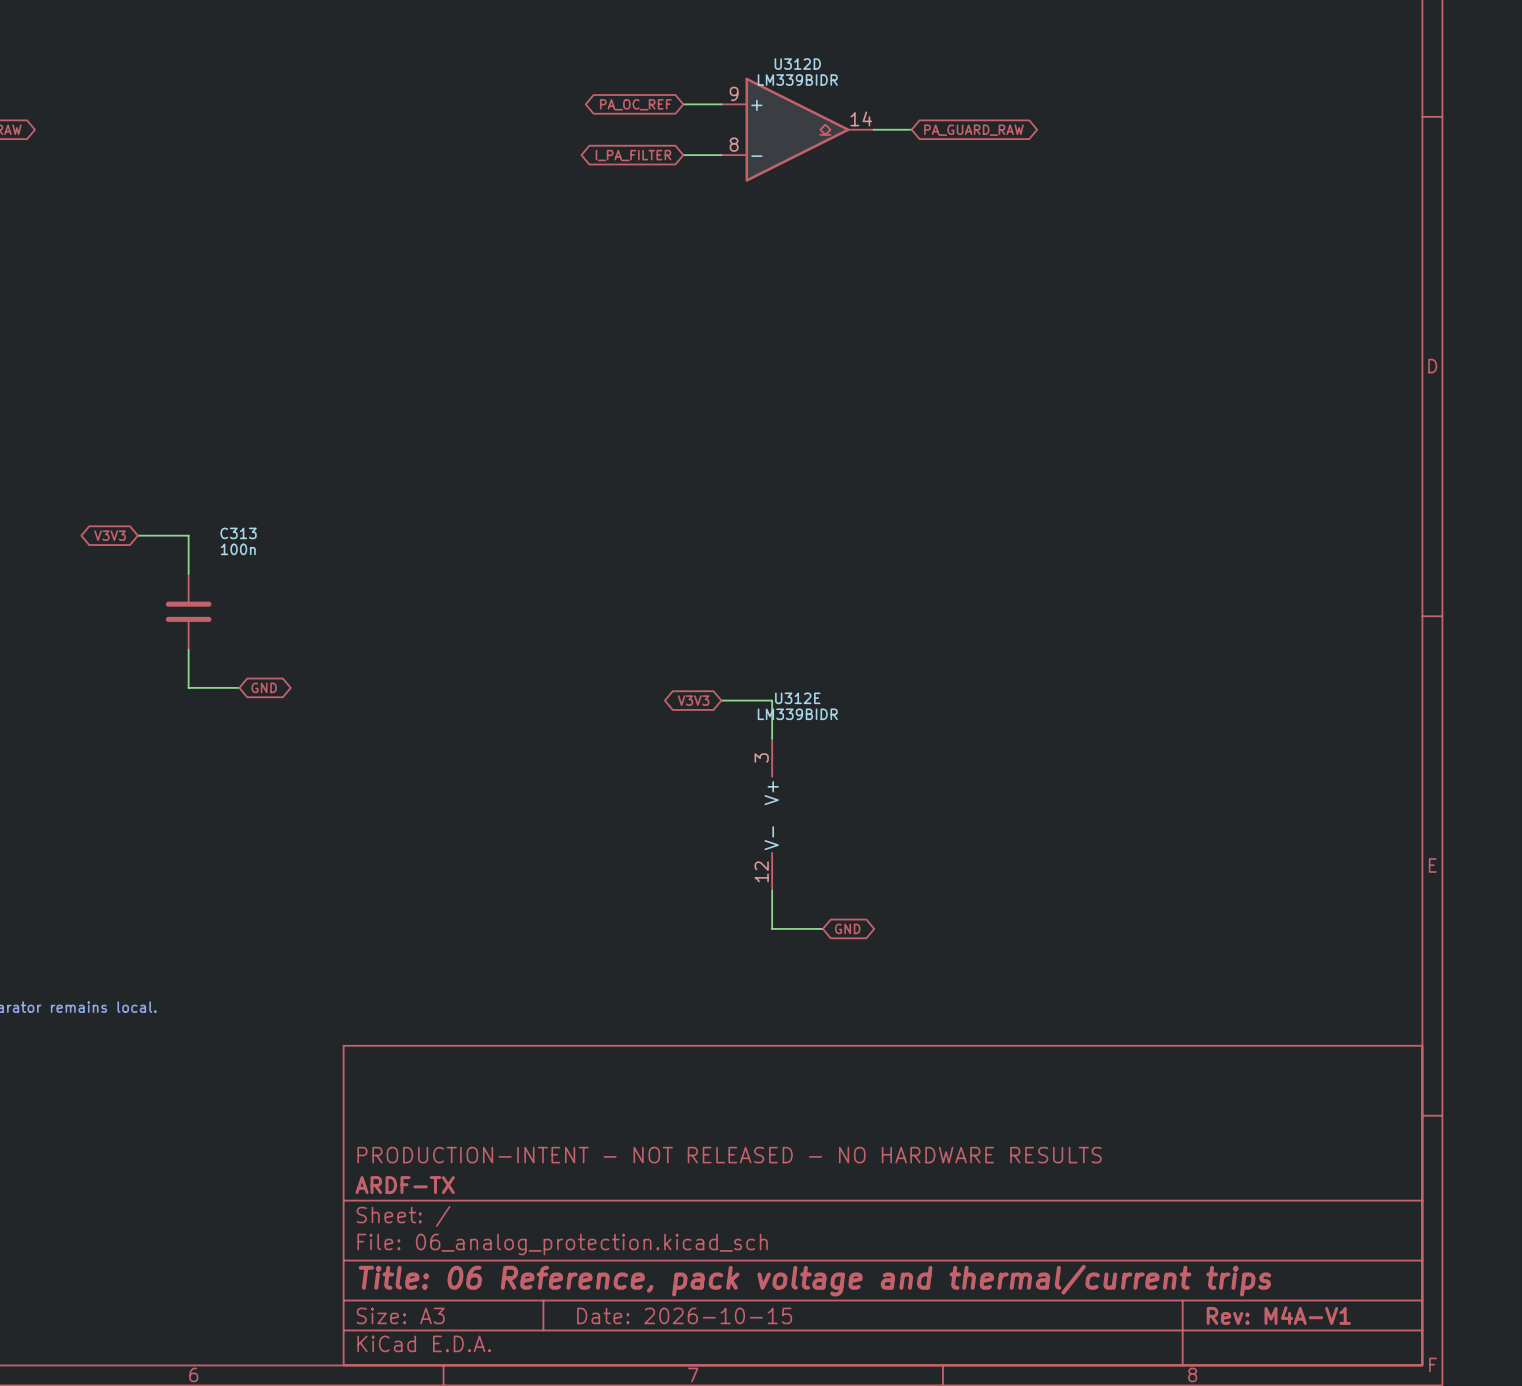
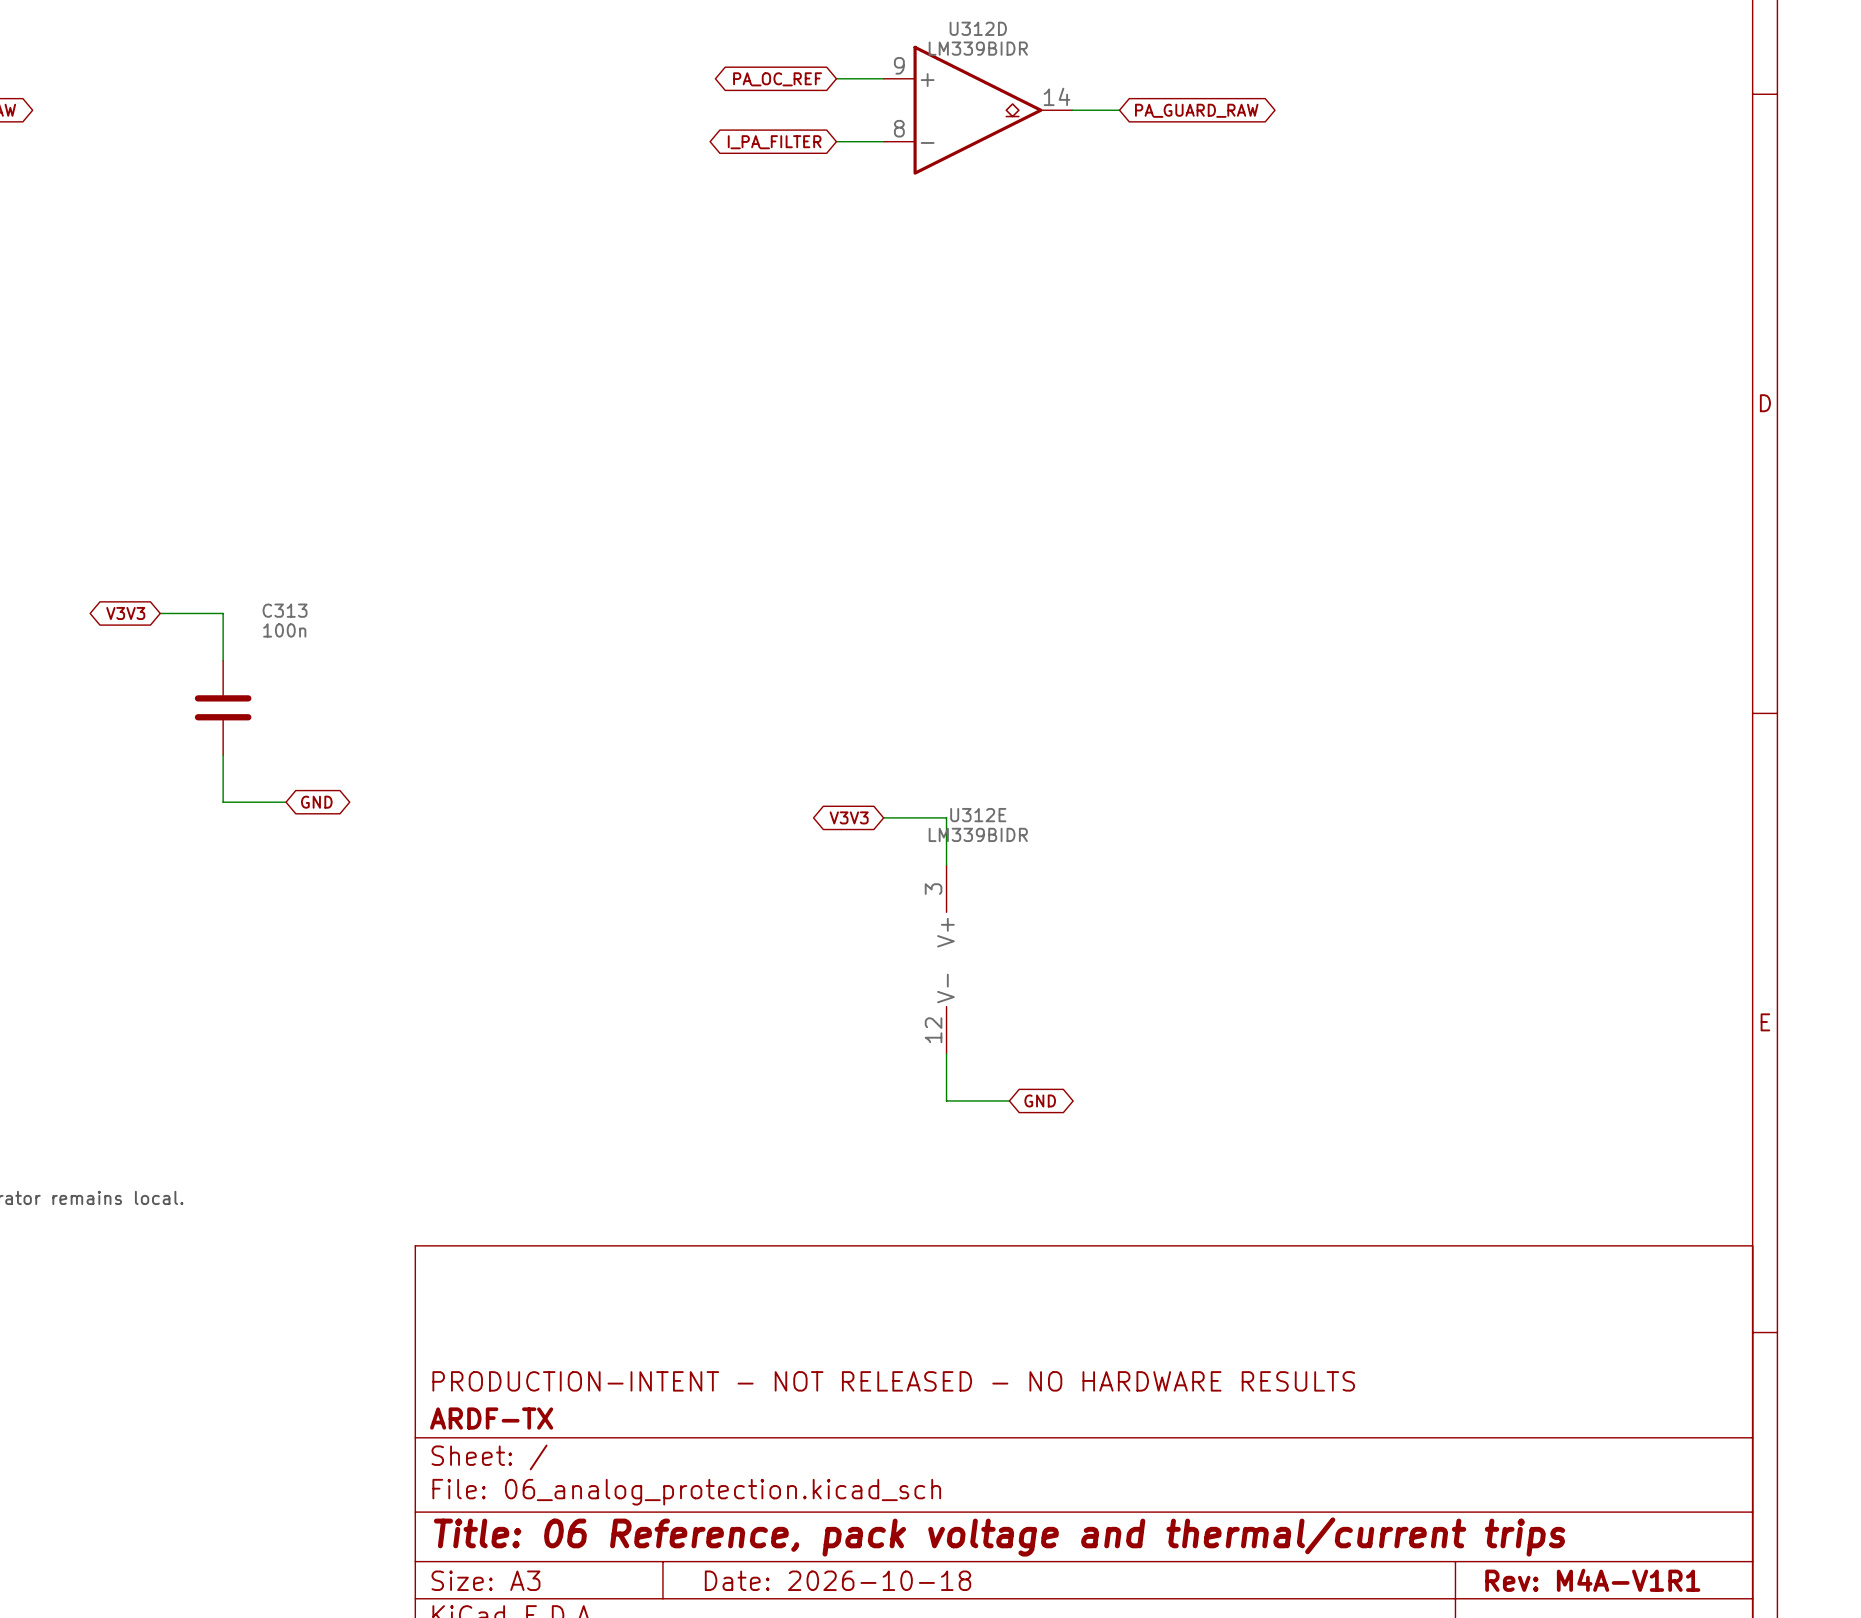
title block: Date: 2026-10-15 (684, 1315) -> Date: 2026-10-18 (838, 1580)
title block: Rev: M4A-V1 (1278, 1315) -> Rev: M4A-V1R1 (1592, 1580)

